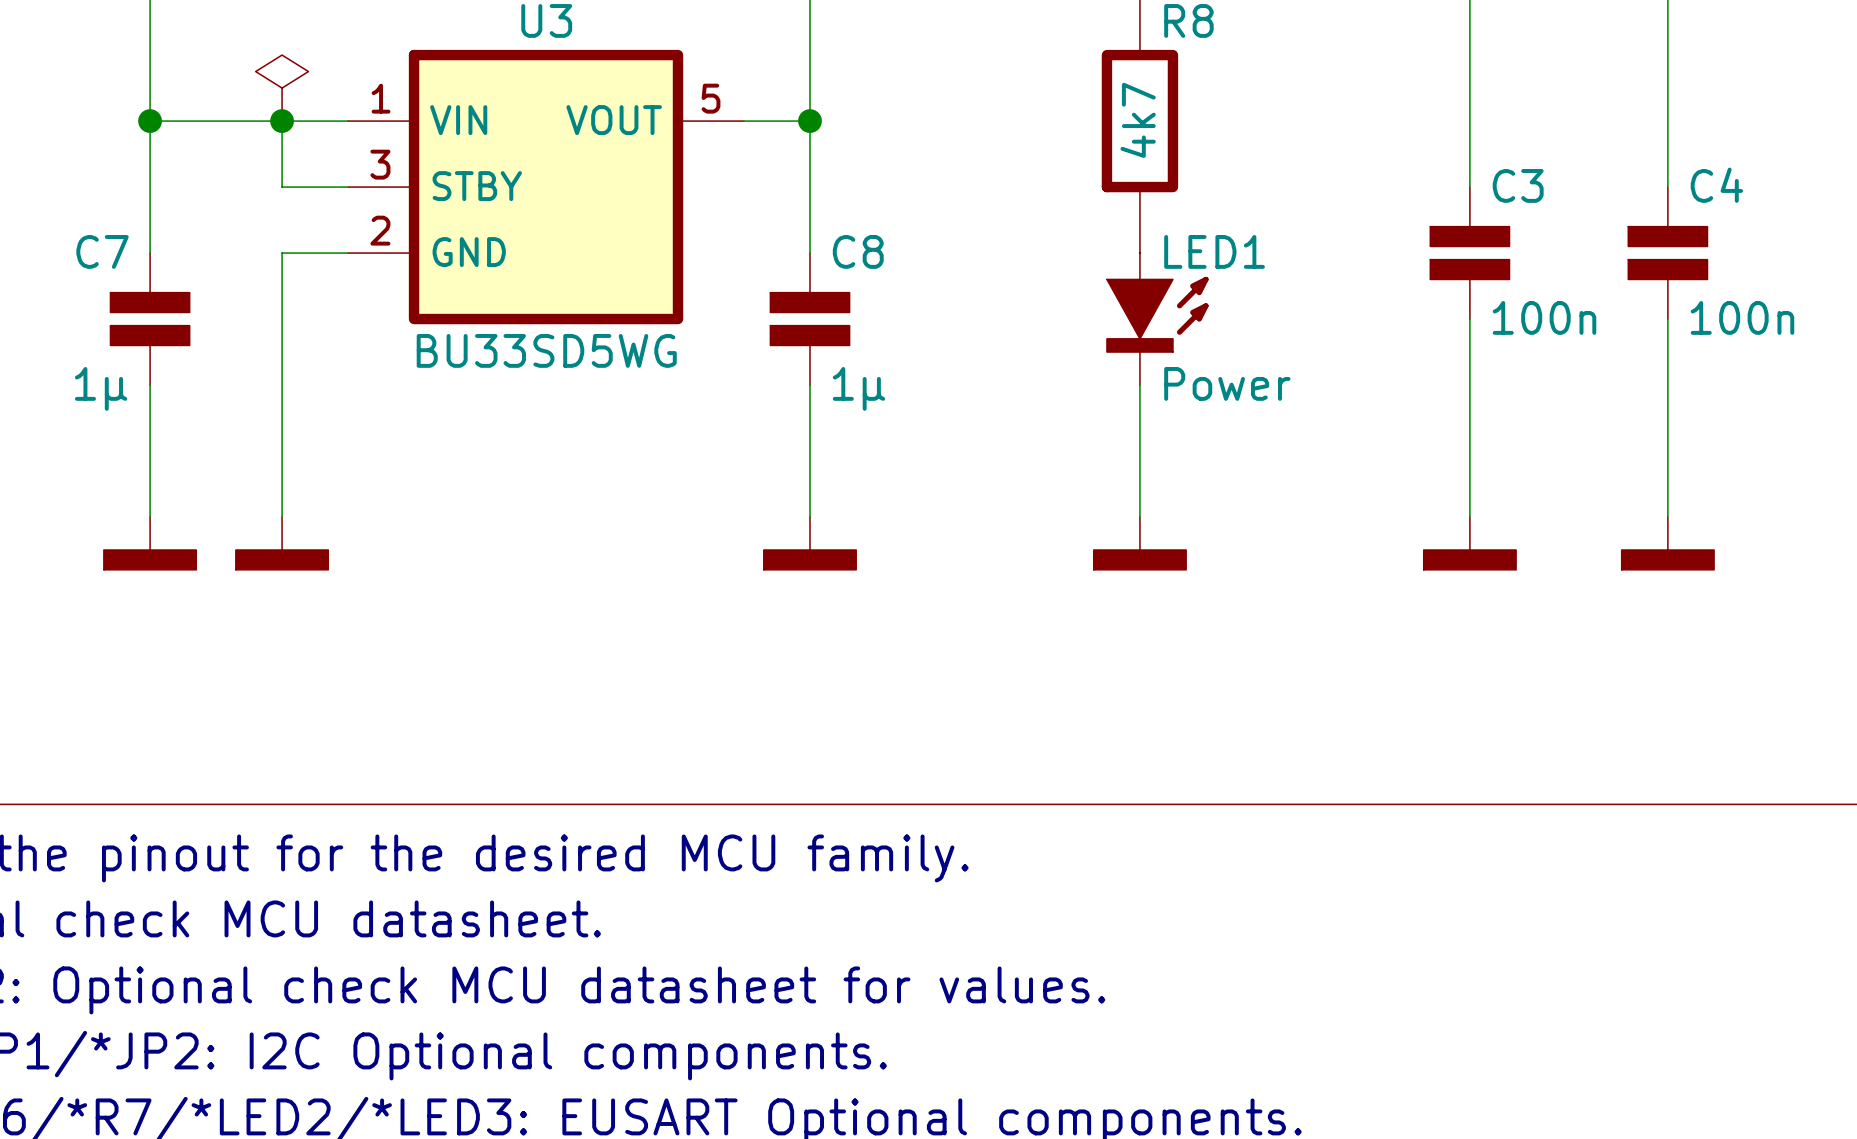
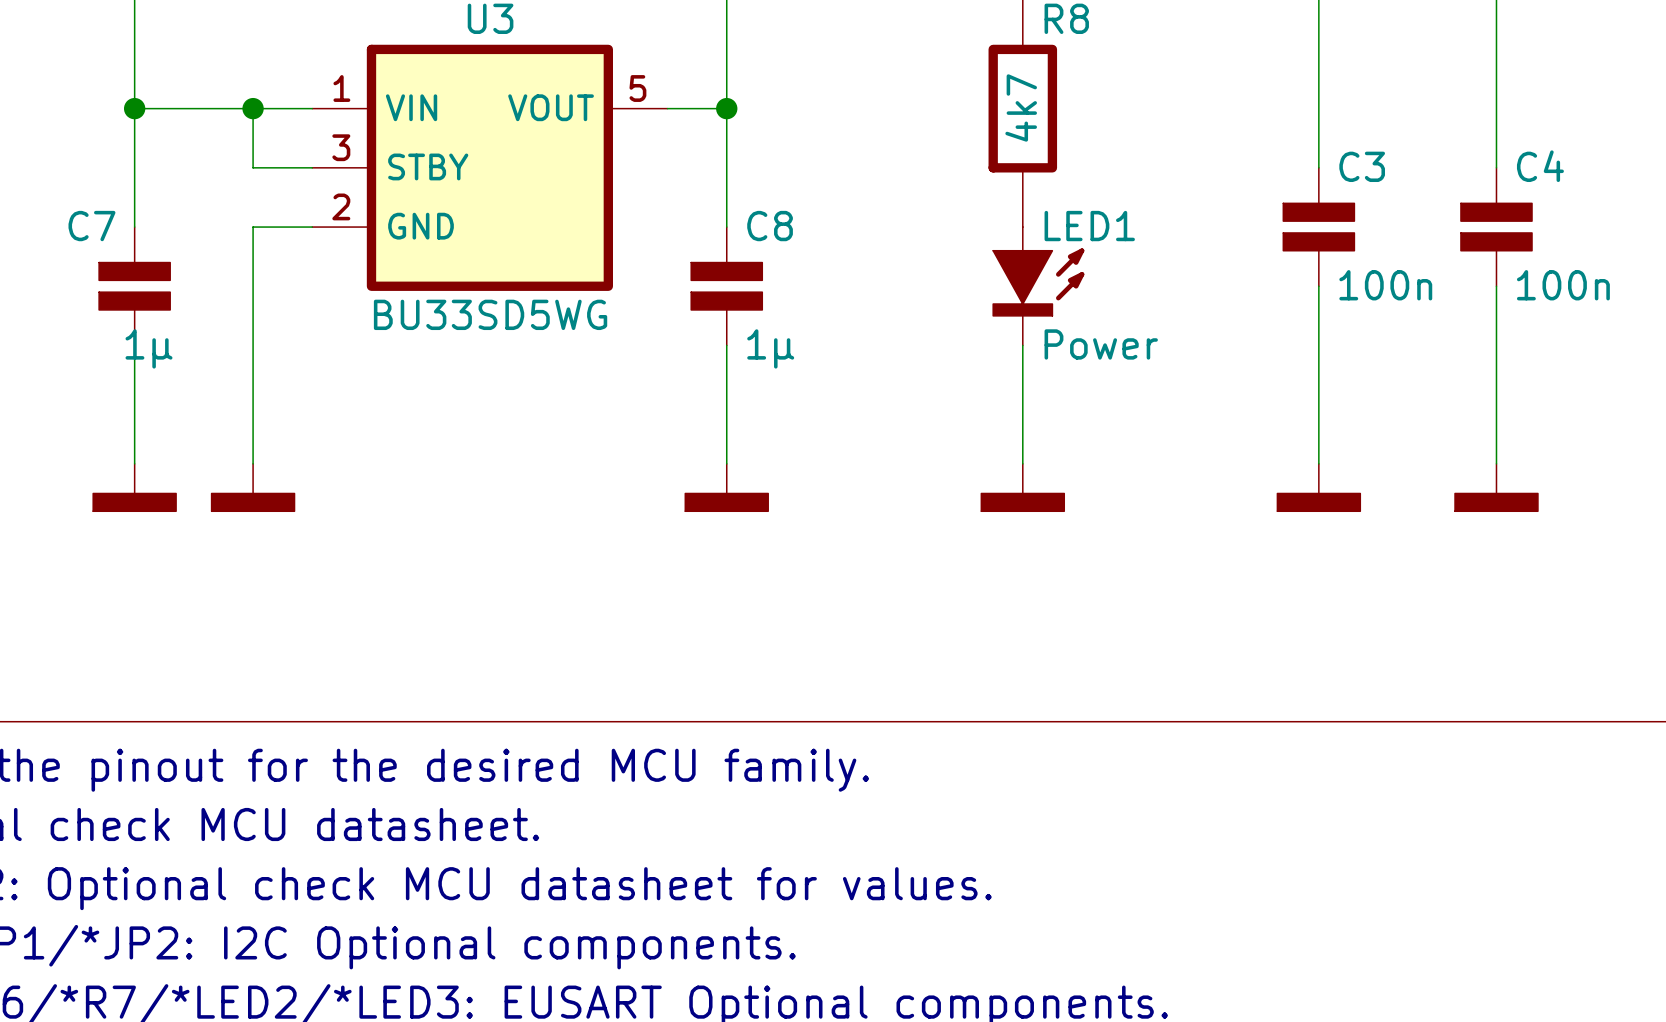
power symbol: (282, 88) -> none
C7 value position: 1µ (101, 388) -> 1µ (148, 348)

